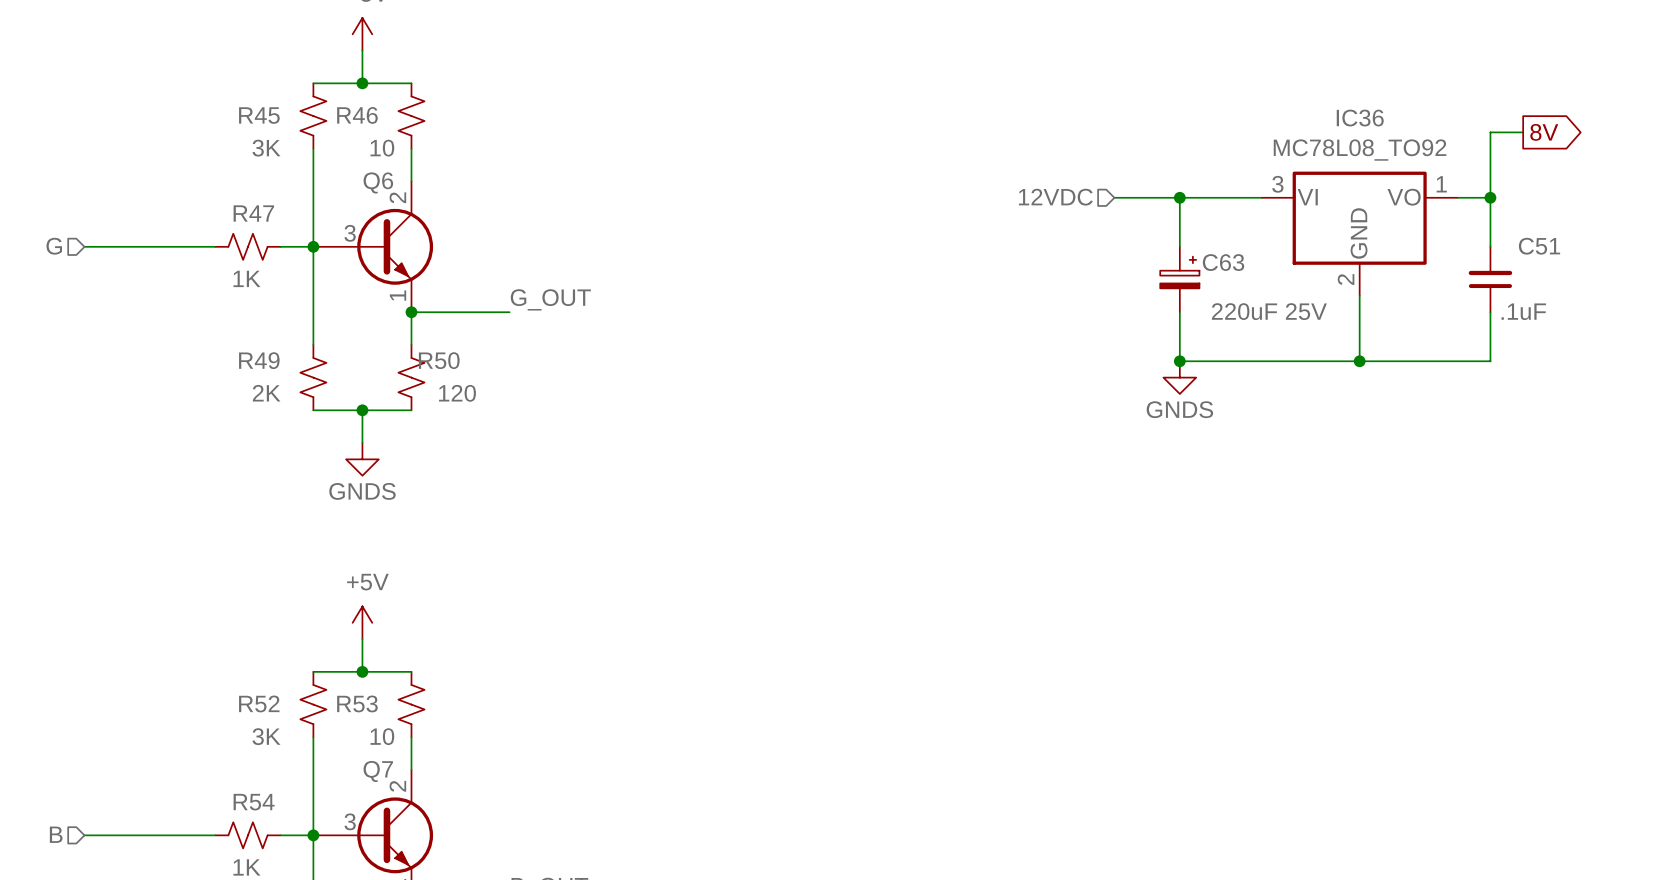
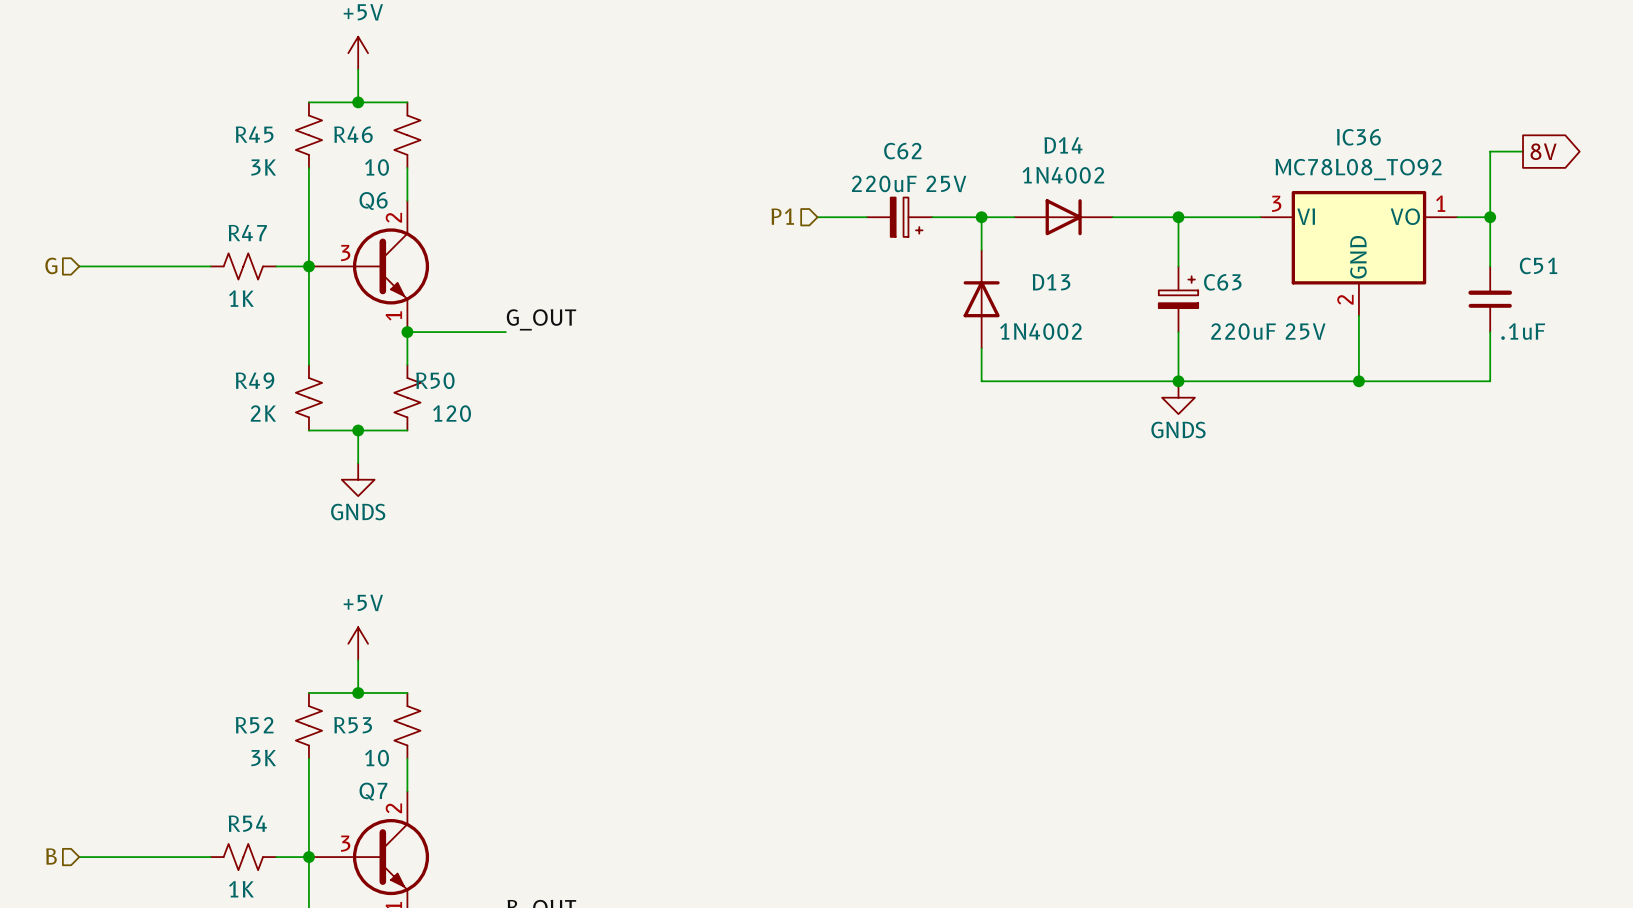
hierarchical label: none -> P1 (782, 216)
wire: none -> (817, 217) (866, 217)
C62: none -> 220uF 25V (899, 217)
wire: none -> (932, 217) (1014, 217)
wire: none -> (981, 217) (981, 250)
junction: none -> (981, 217)
hierarchical label: 12VDC (1055, 197) -> none
D14: none -> 1N4002 (1063, 217)
D13: none -> 1N4002 (981, 299)
wire: none -> (981, 348) (981, 381) (1178, 381)

